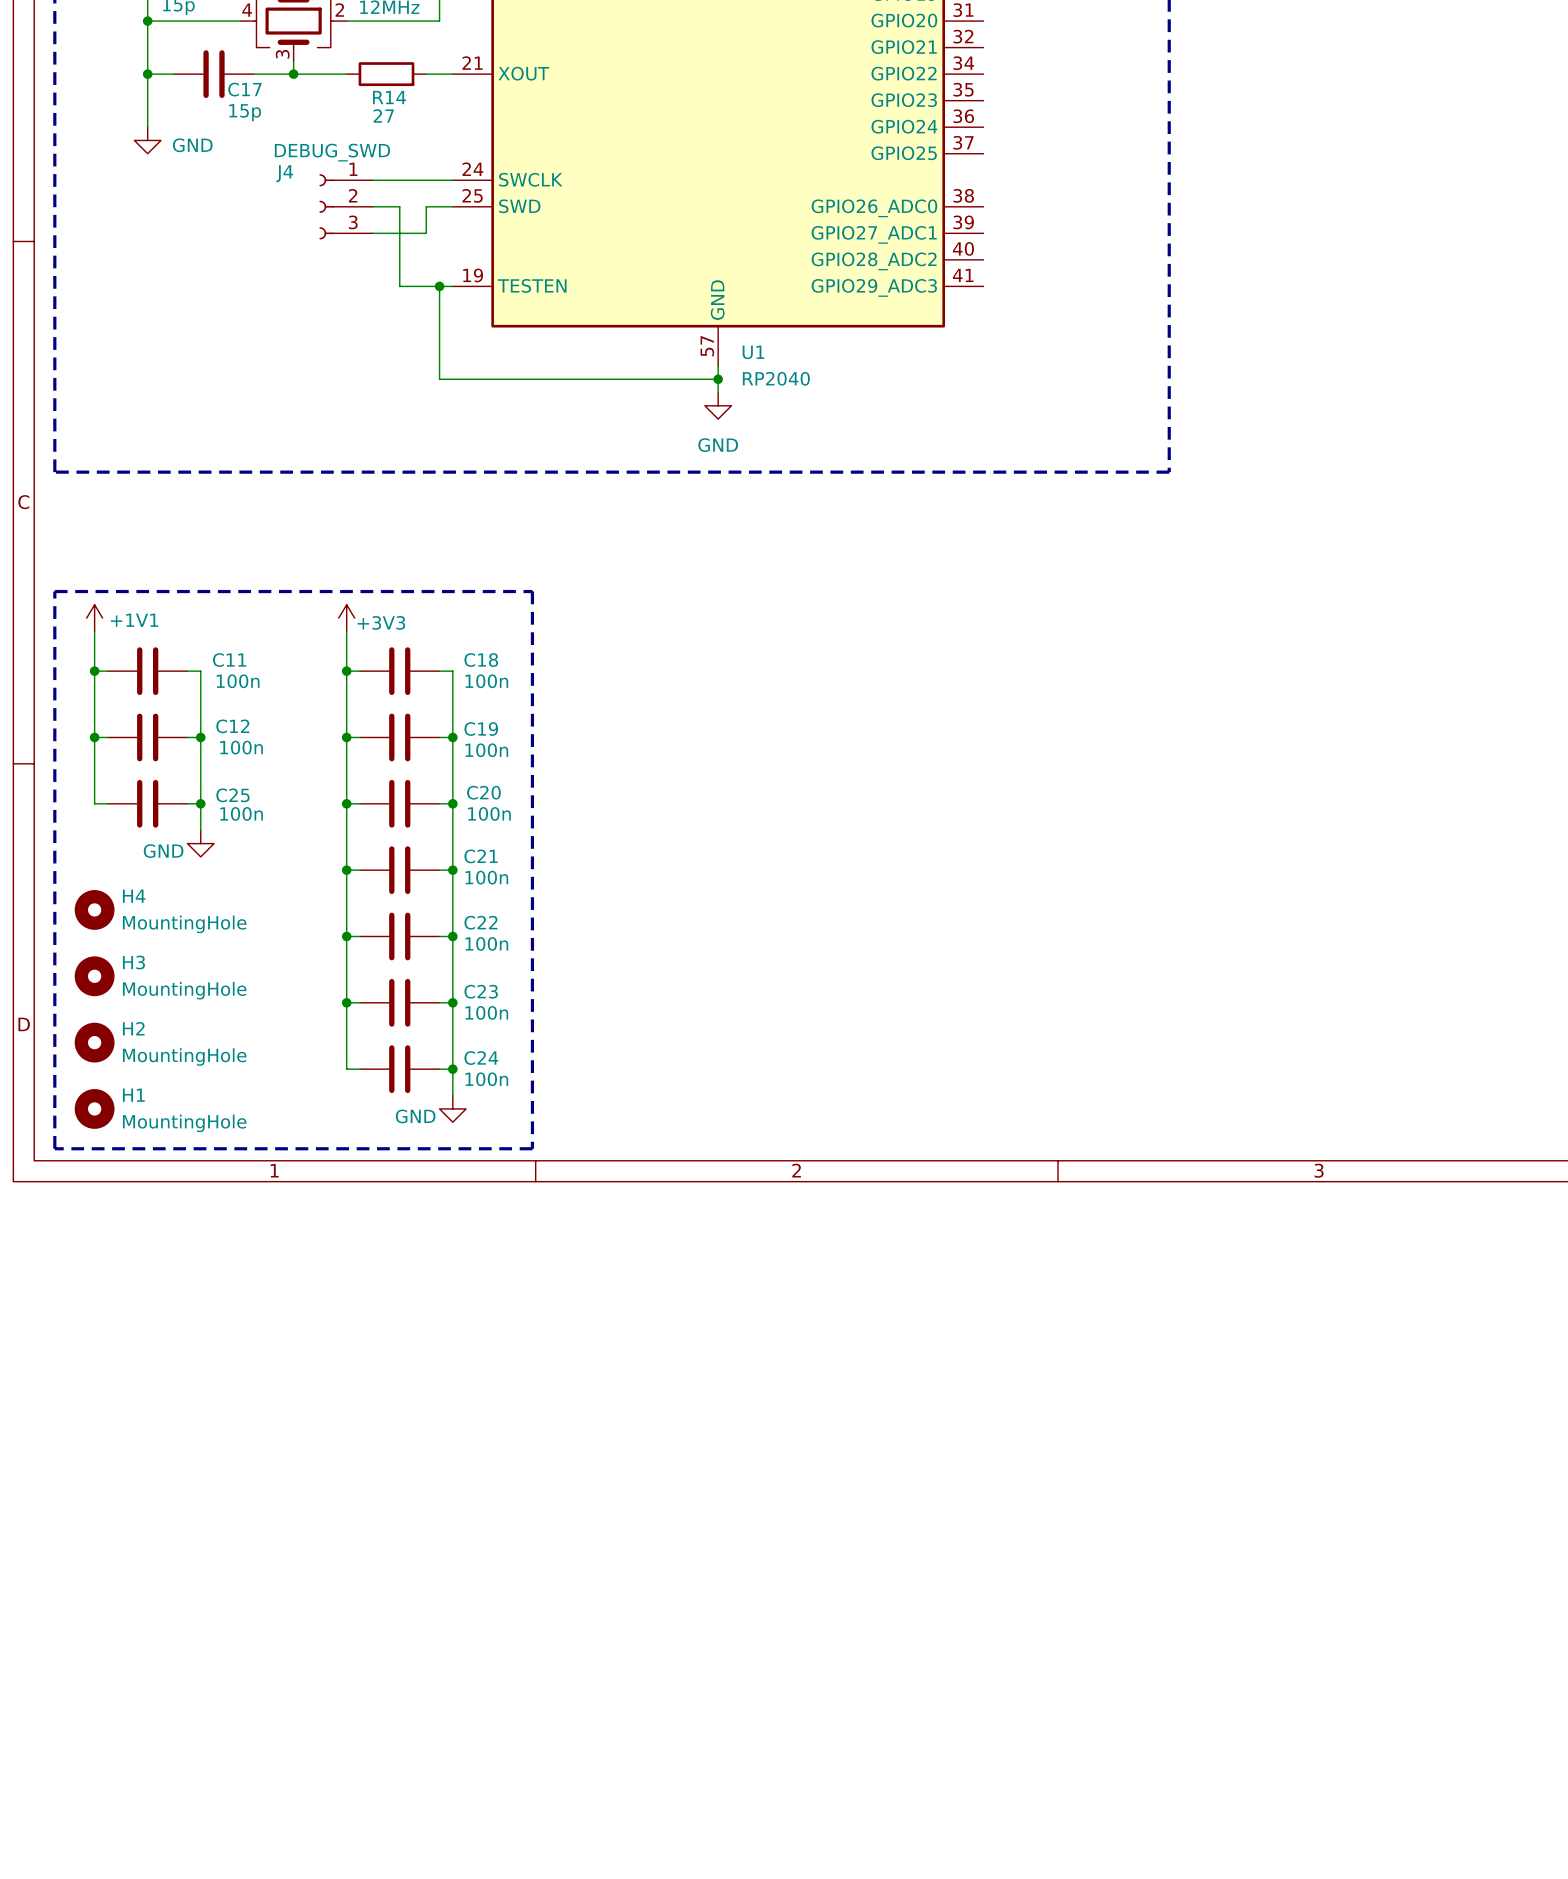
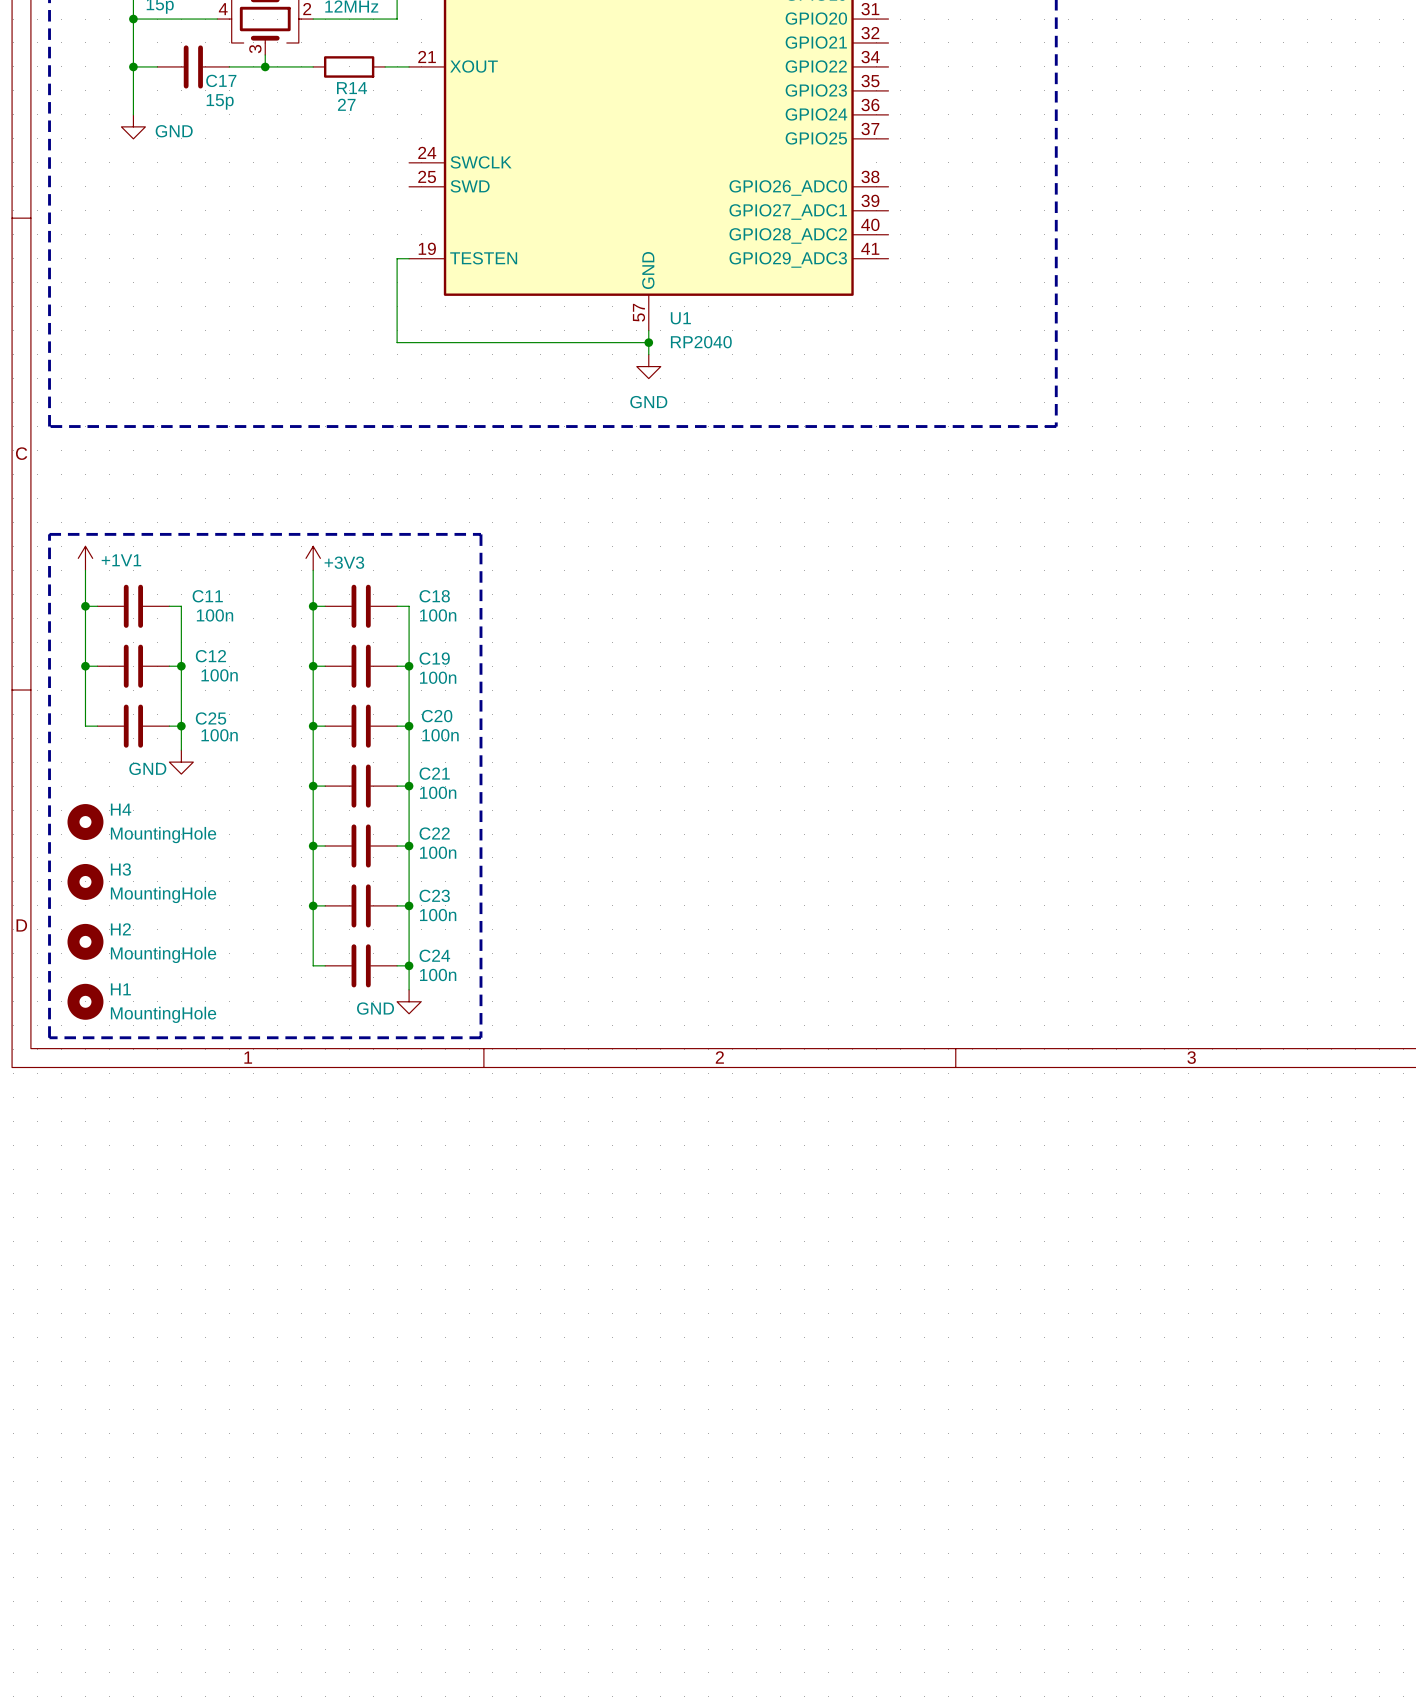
wire: (373, 180) (452, 180) -> none
J4: DEBUG_SWD (346, 206) -> none
wire: (373, 206) (399, 206) (399, 286) (439, 286) -> none
wire: (452, 206) (426, 206) (426, 233) (373, 233) -> none
junction: (439, 286) -> none

